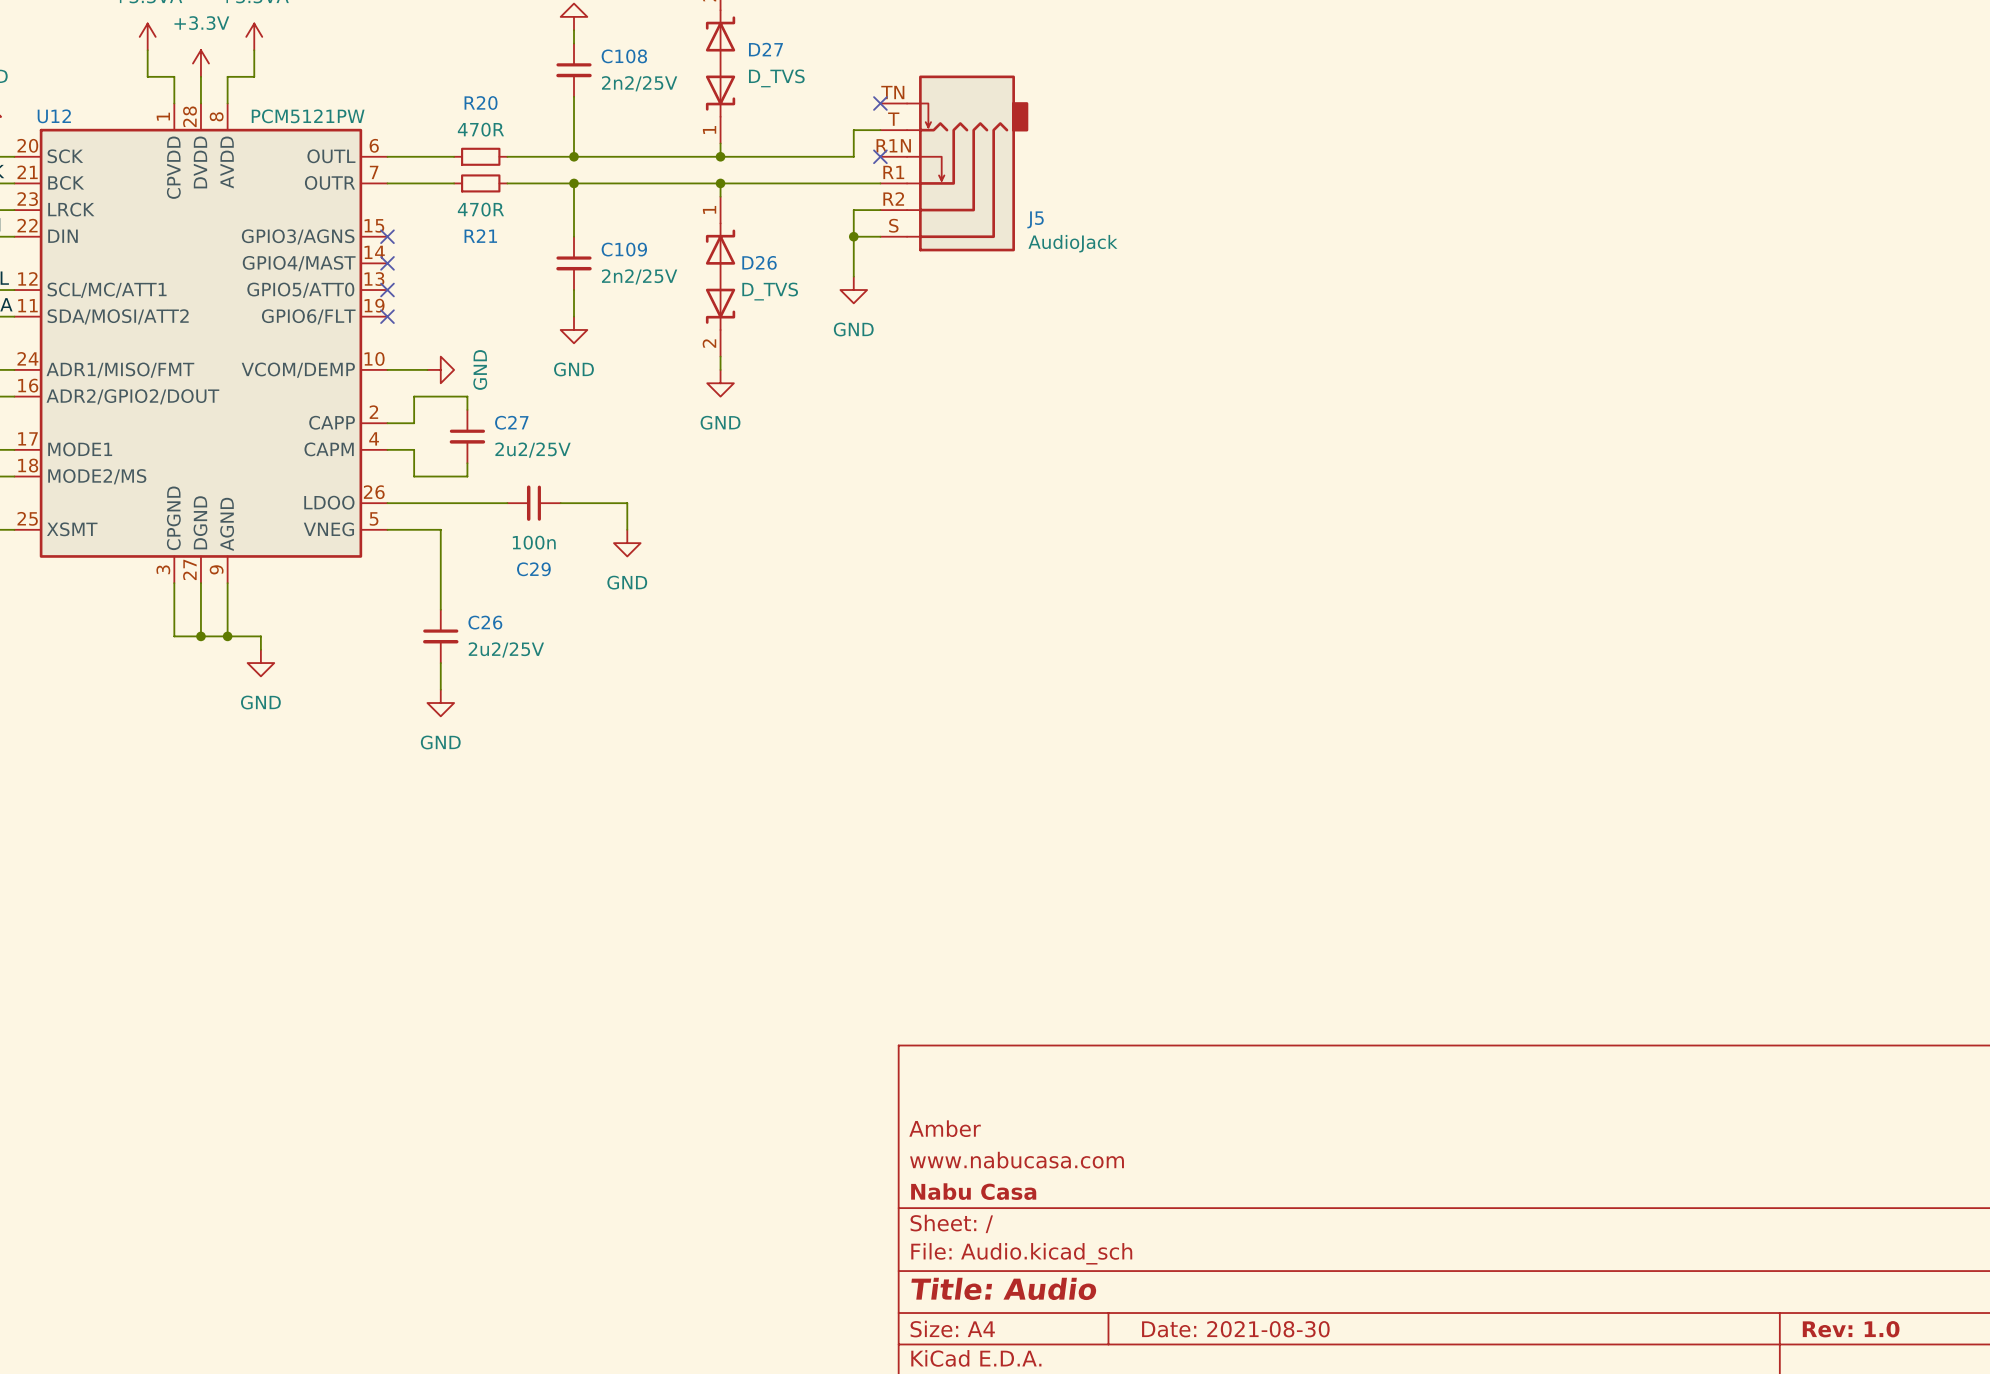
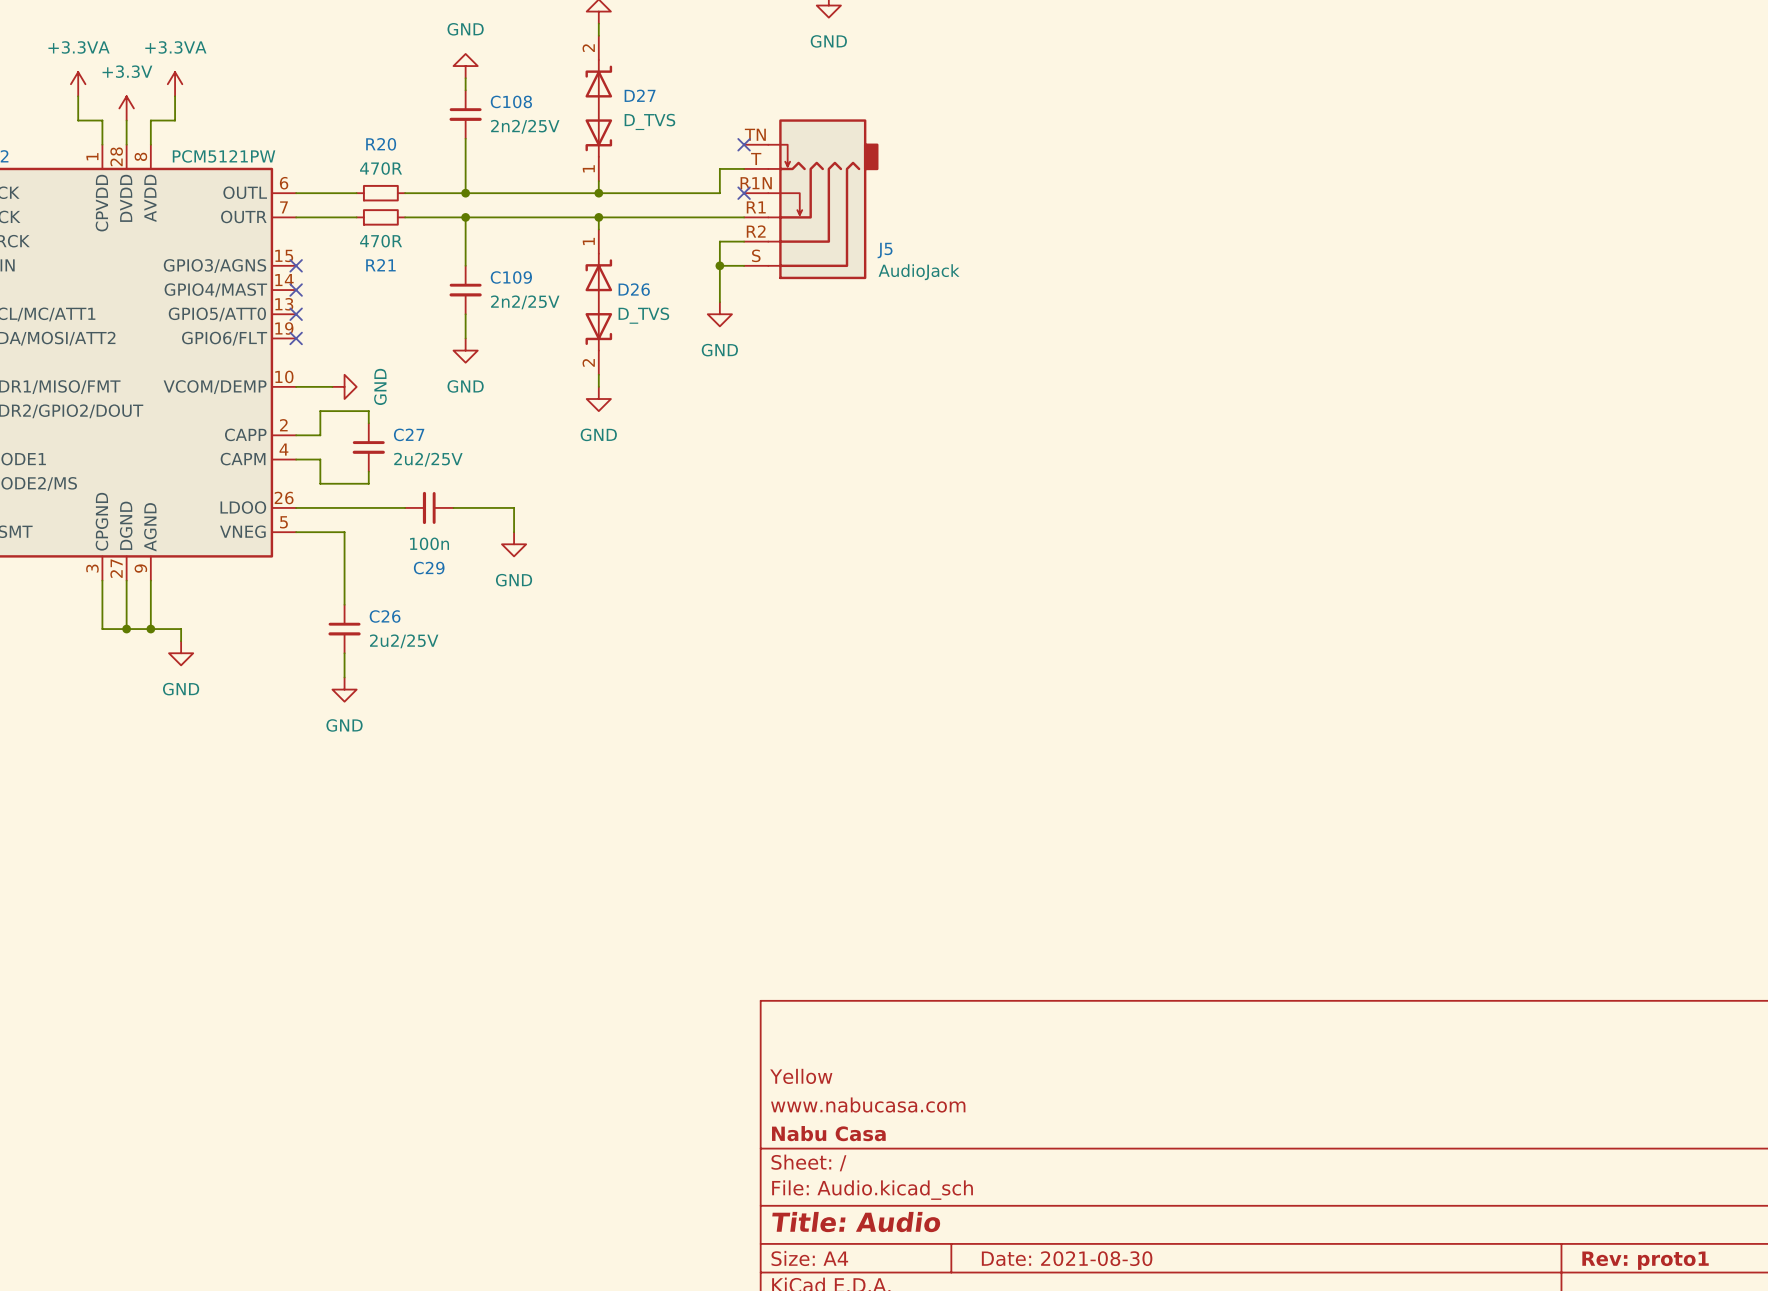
title block: Amber (945, 1128) -> Yellow (801, 1076)
title block: Rev: 1.0 (1851, 1329) -> Rev: proto1 (1645, 1260)

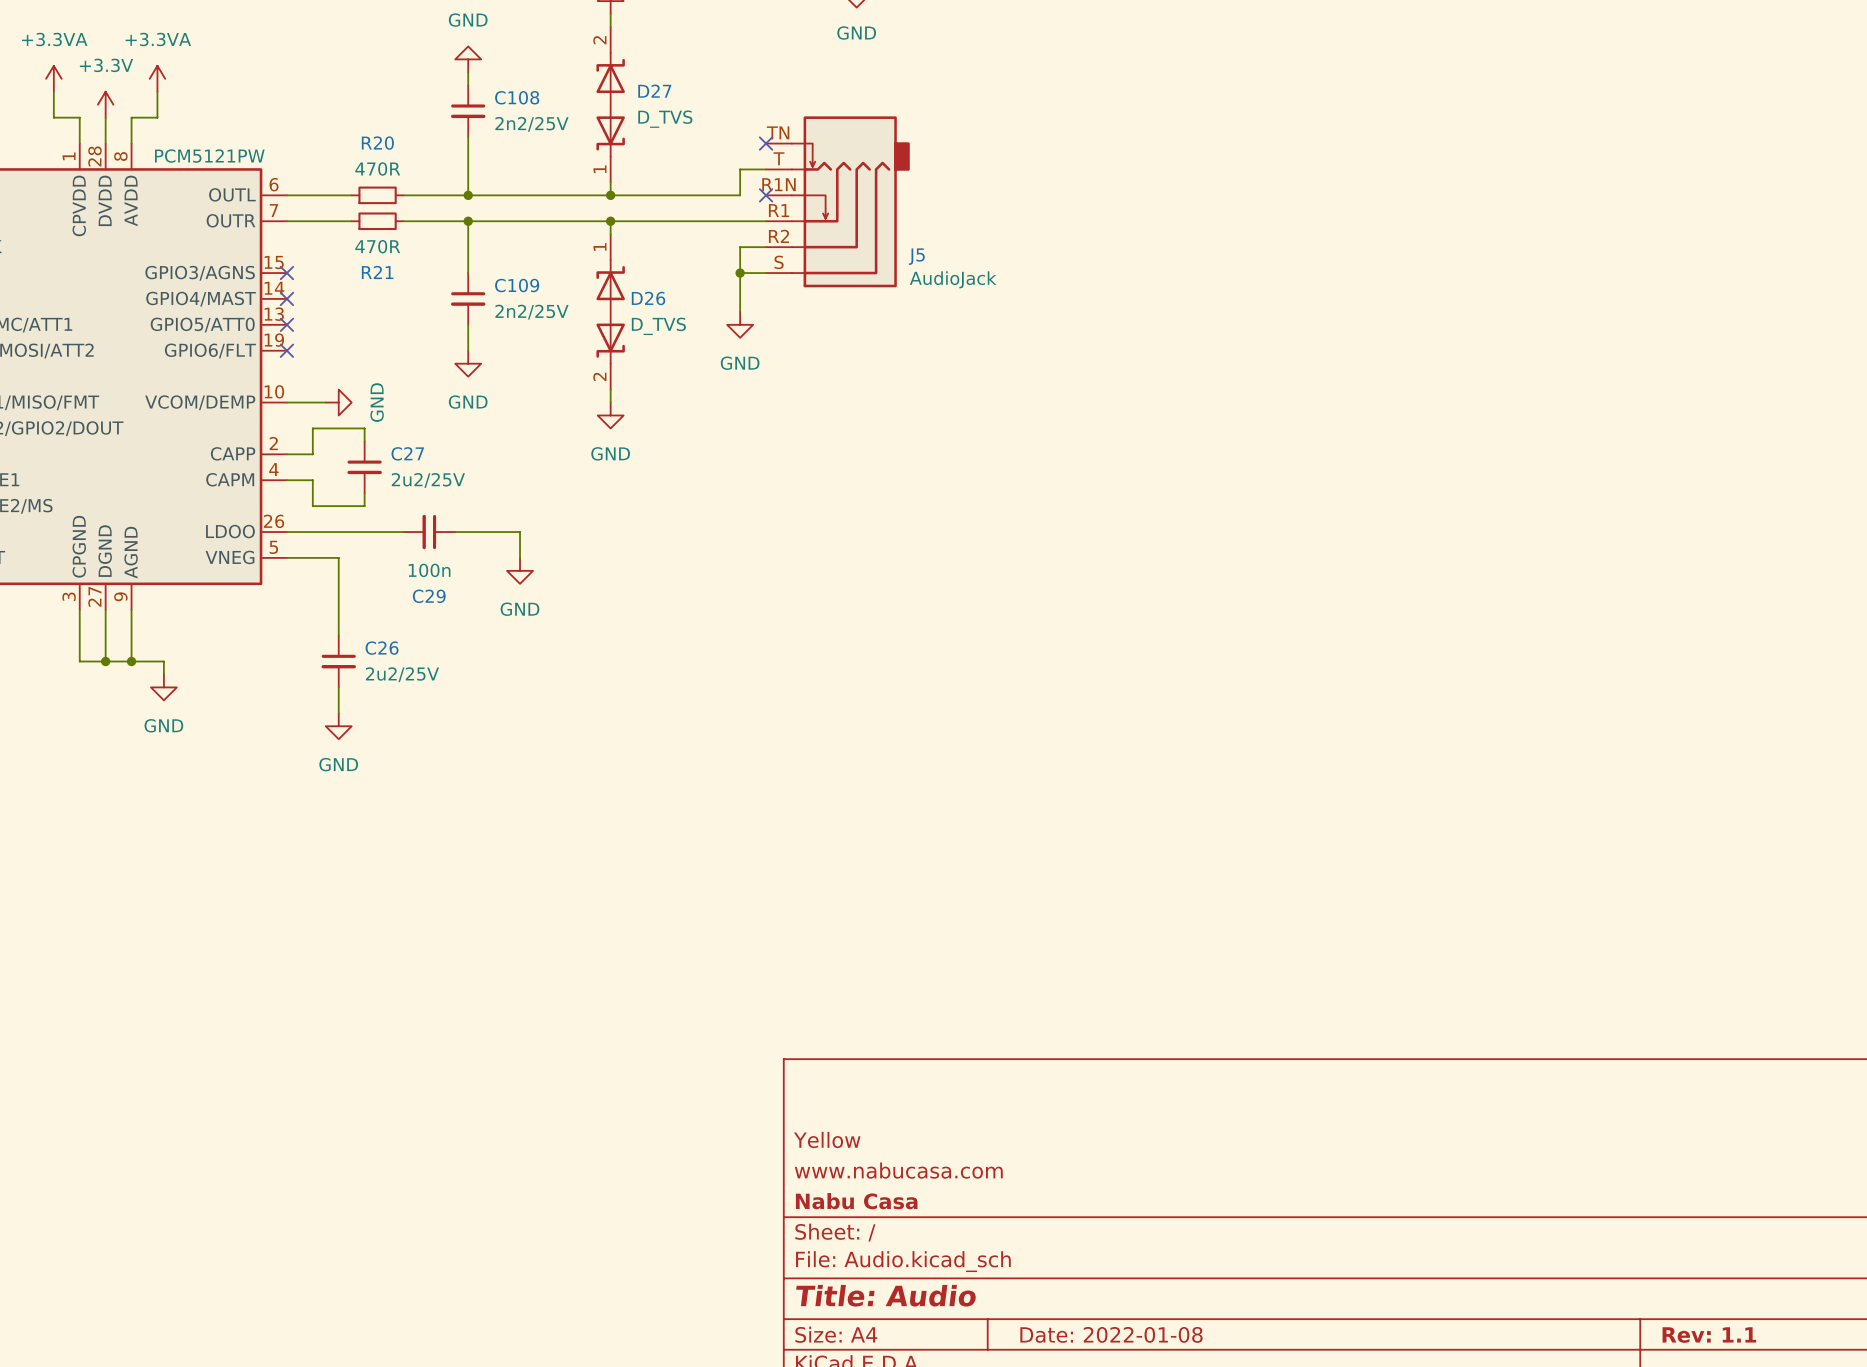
title block: Date: 2021-08-30 (1067, 1258) -> Date: 2022-01-08 (1111, 1334)
title block: Rev: proto1 (1645, 1260) -> Rev: 1.1 (1709, 1335)

